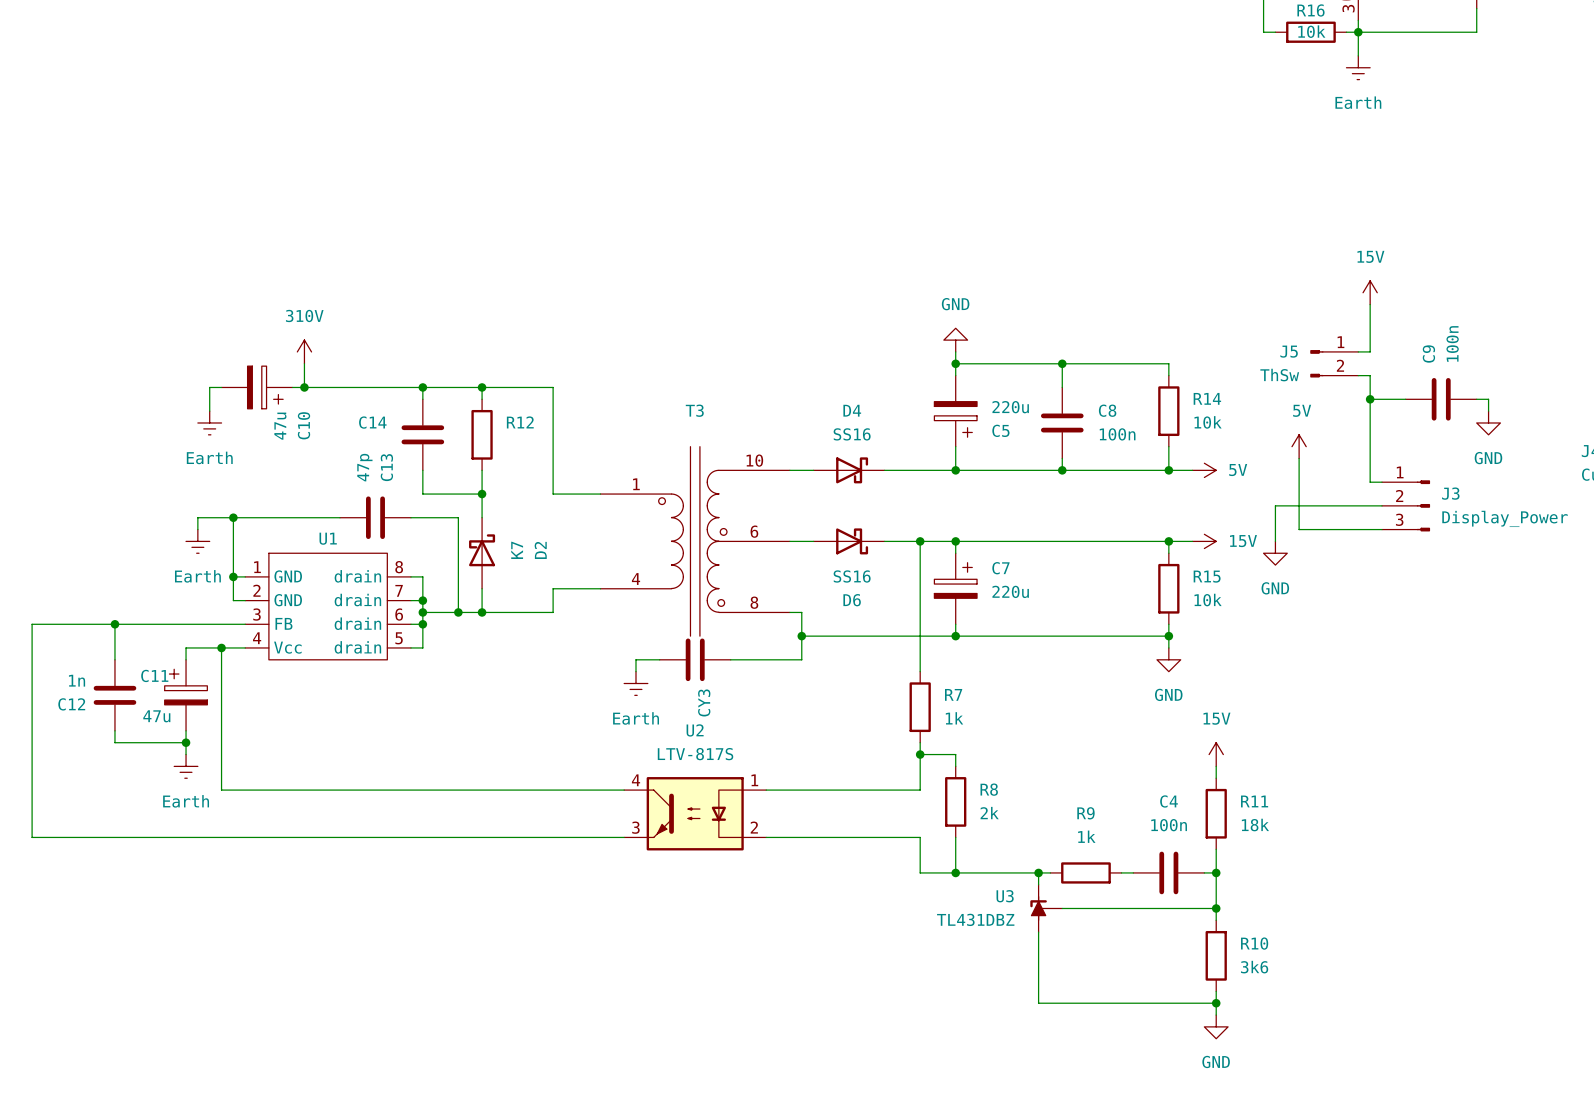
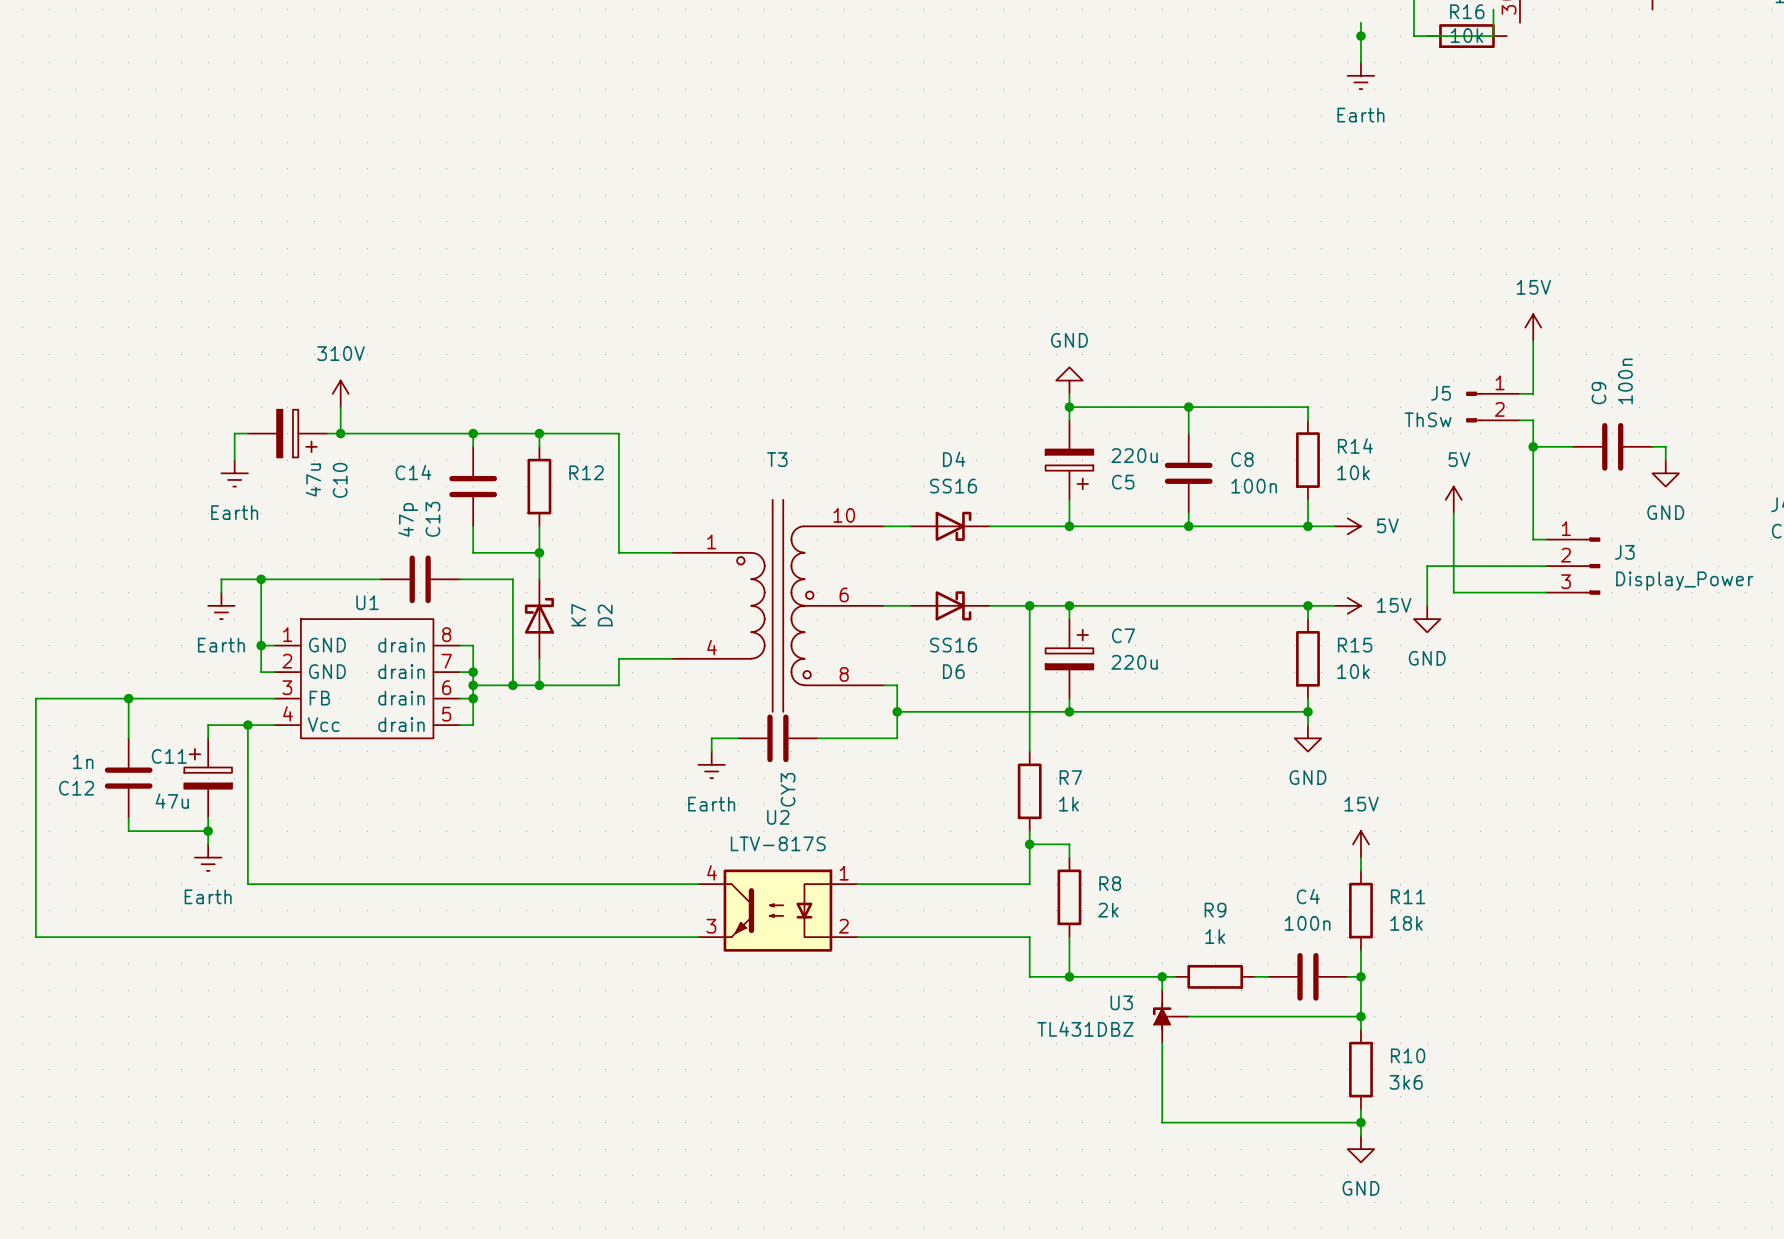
wire: none -> (1493, 9) (1493, 36) (1427, 36)
wire: (1476, 8) (1476, 32) (1346, 32) -> none
wire: (1358, 20) (1358, 55) -> (1360, 22) (1360, 62)
junction: none -> (1360, 36)
junction: (1358, 32) -> none
power symbol: none -> Earth (1360, 75)
power symbol: Earth (1358, 67) -> none

